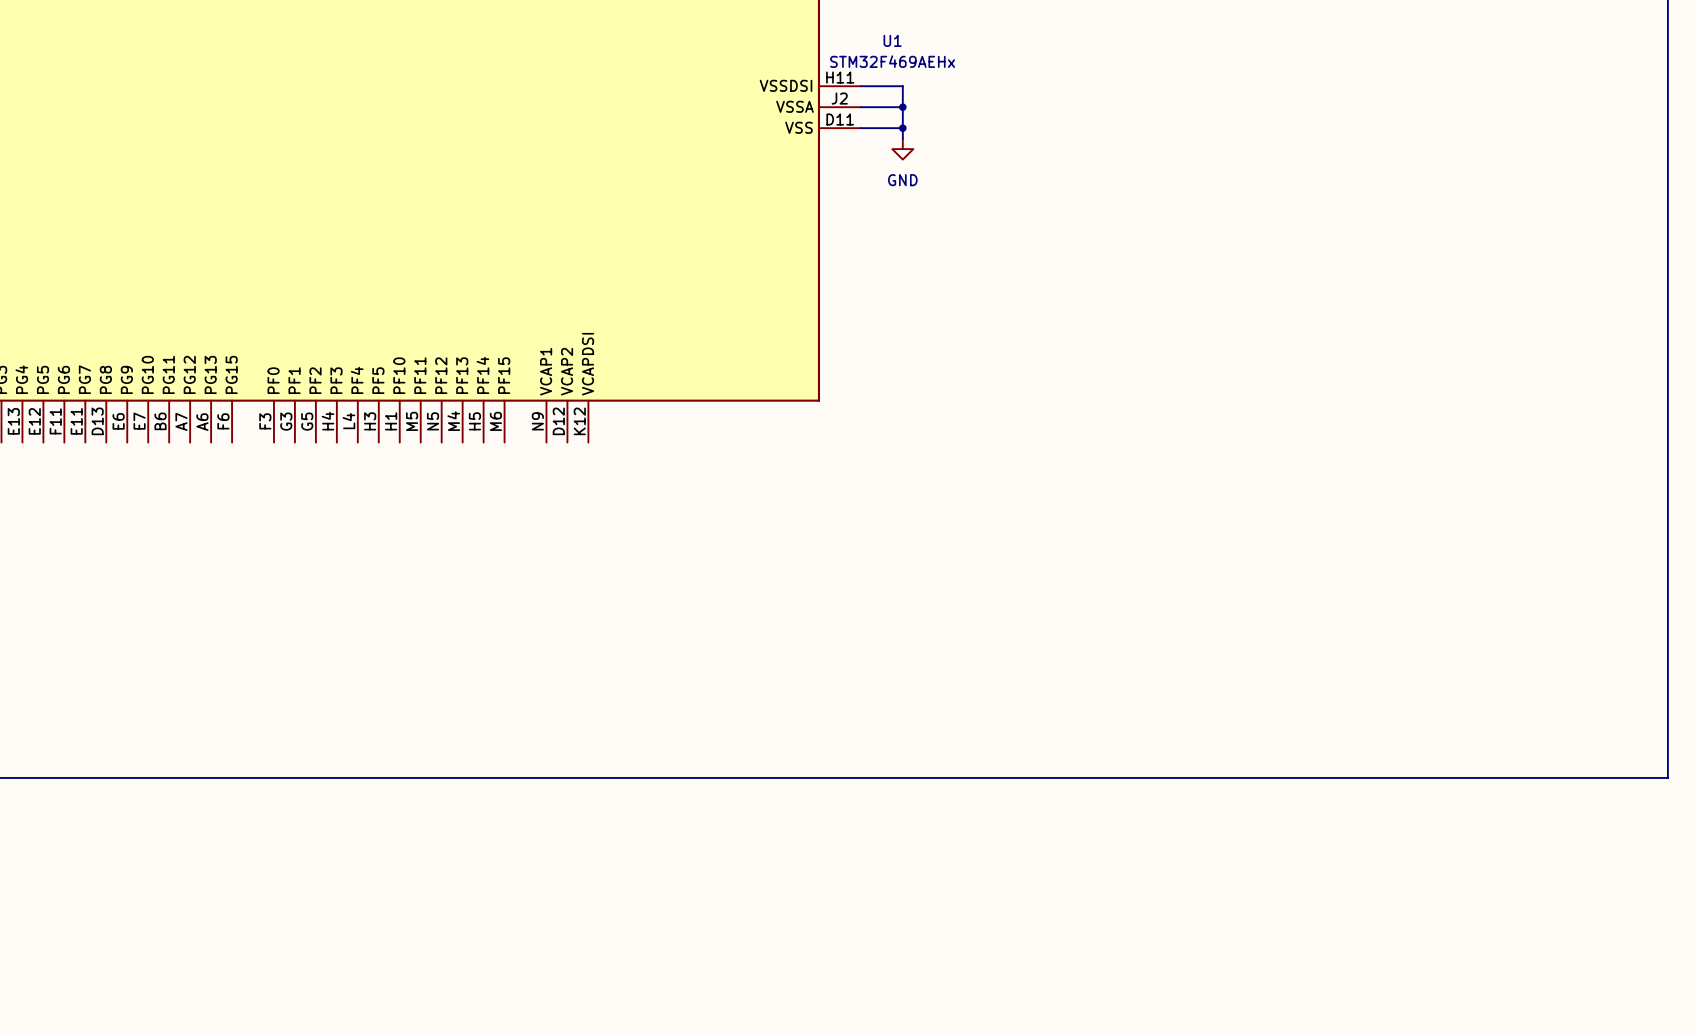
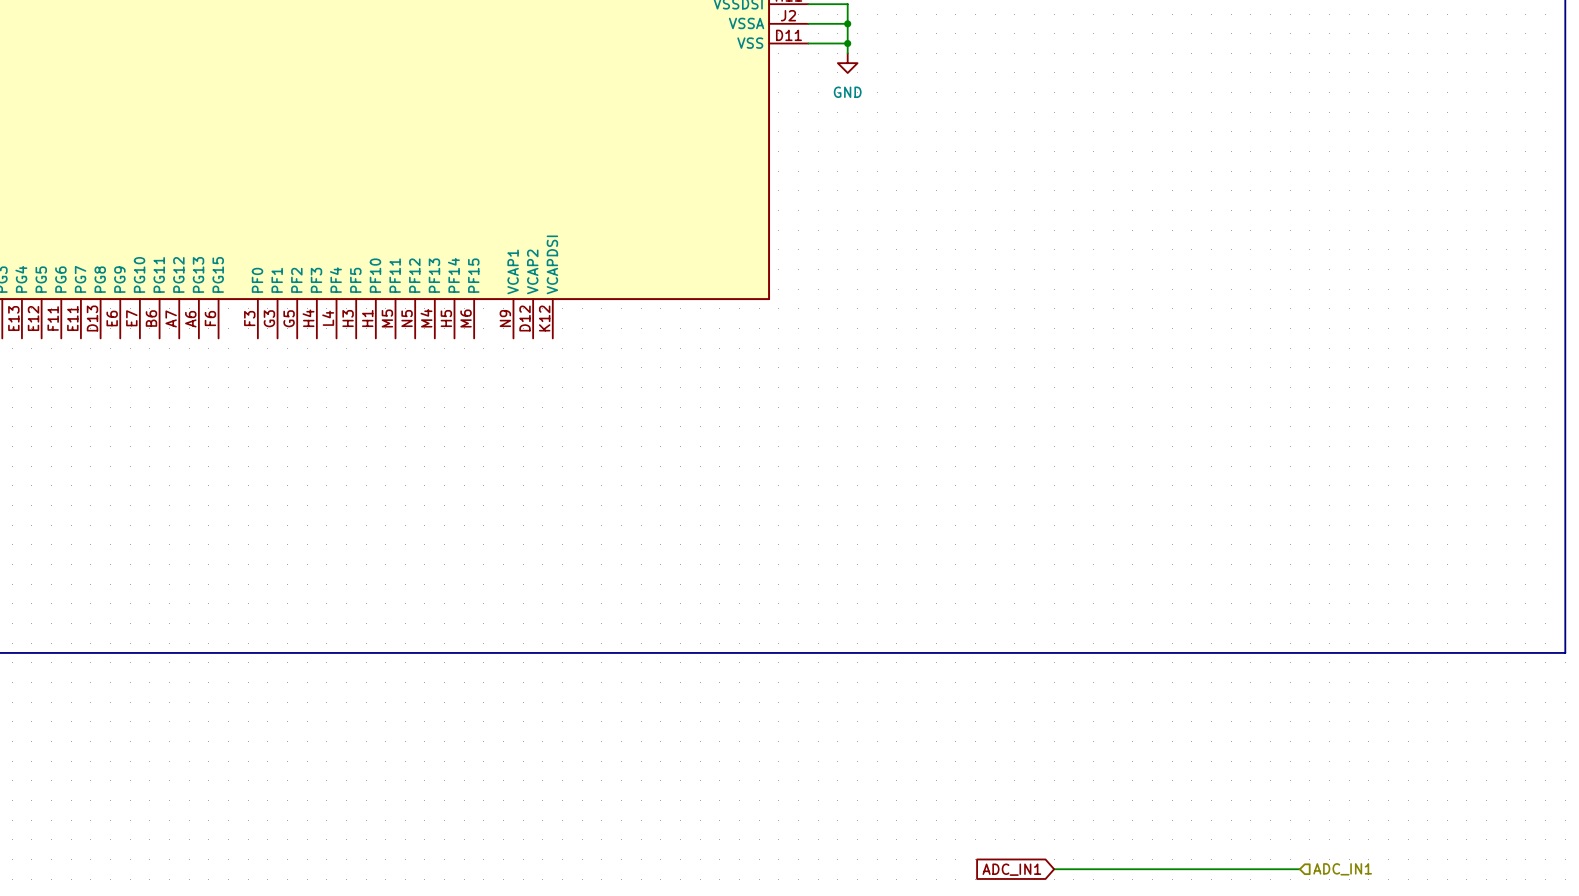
wire: none -> (1054, 869) (1299, 869)
hierarchical label: none -> ADC_IN1 (1342, 869)
global label: none -> ADC_IN1 (1011, 869)

